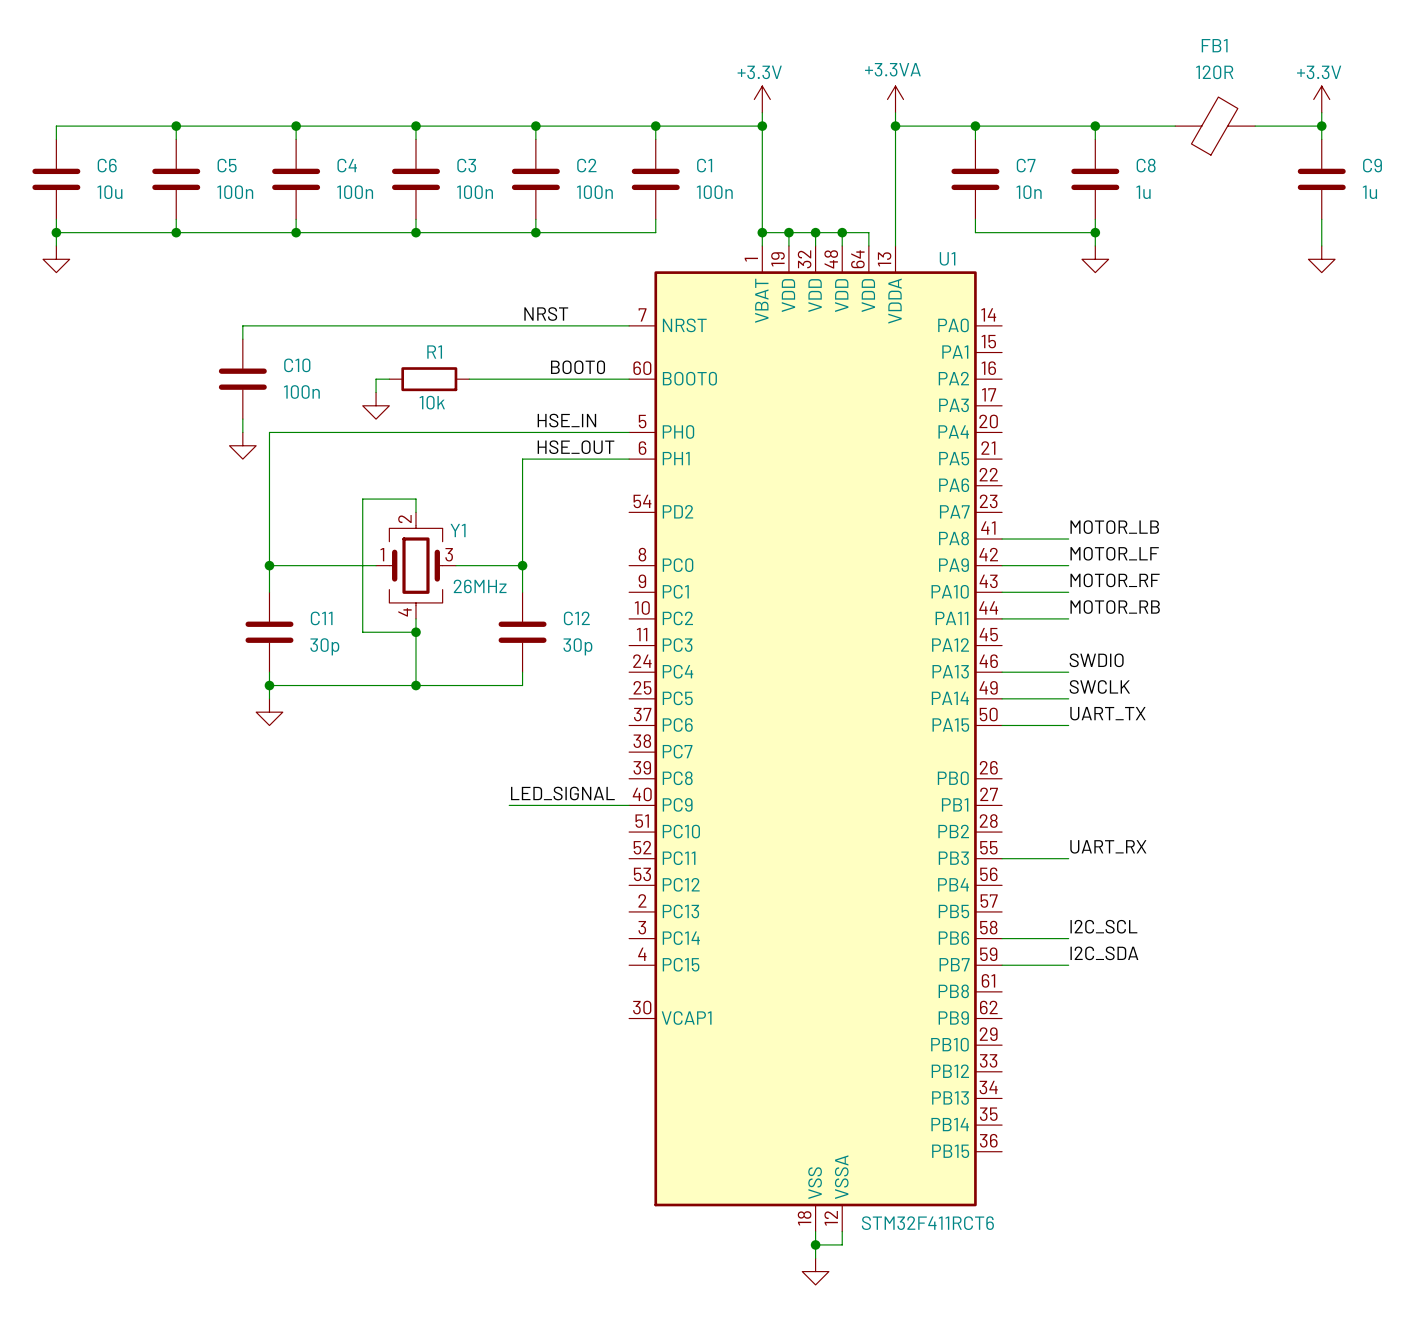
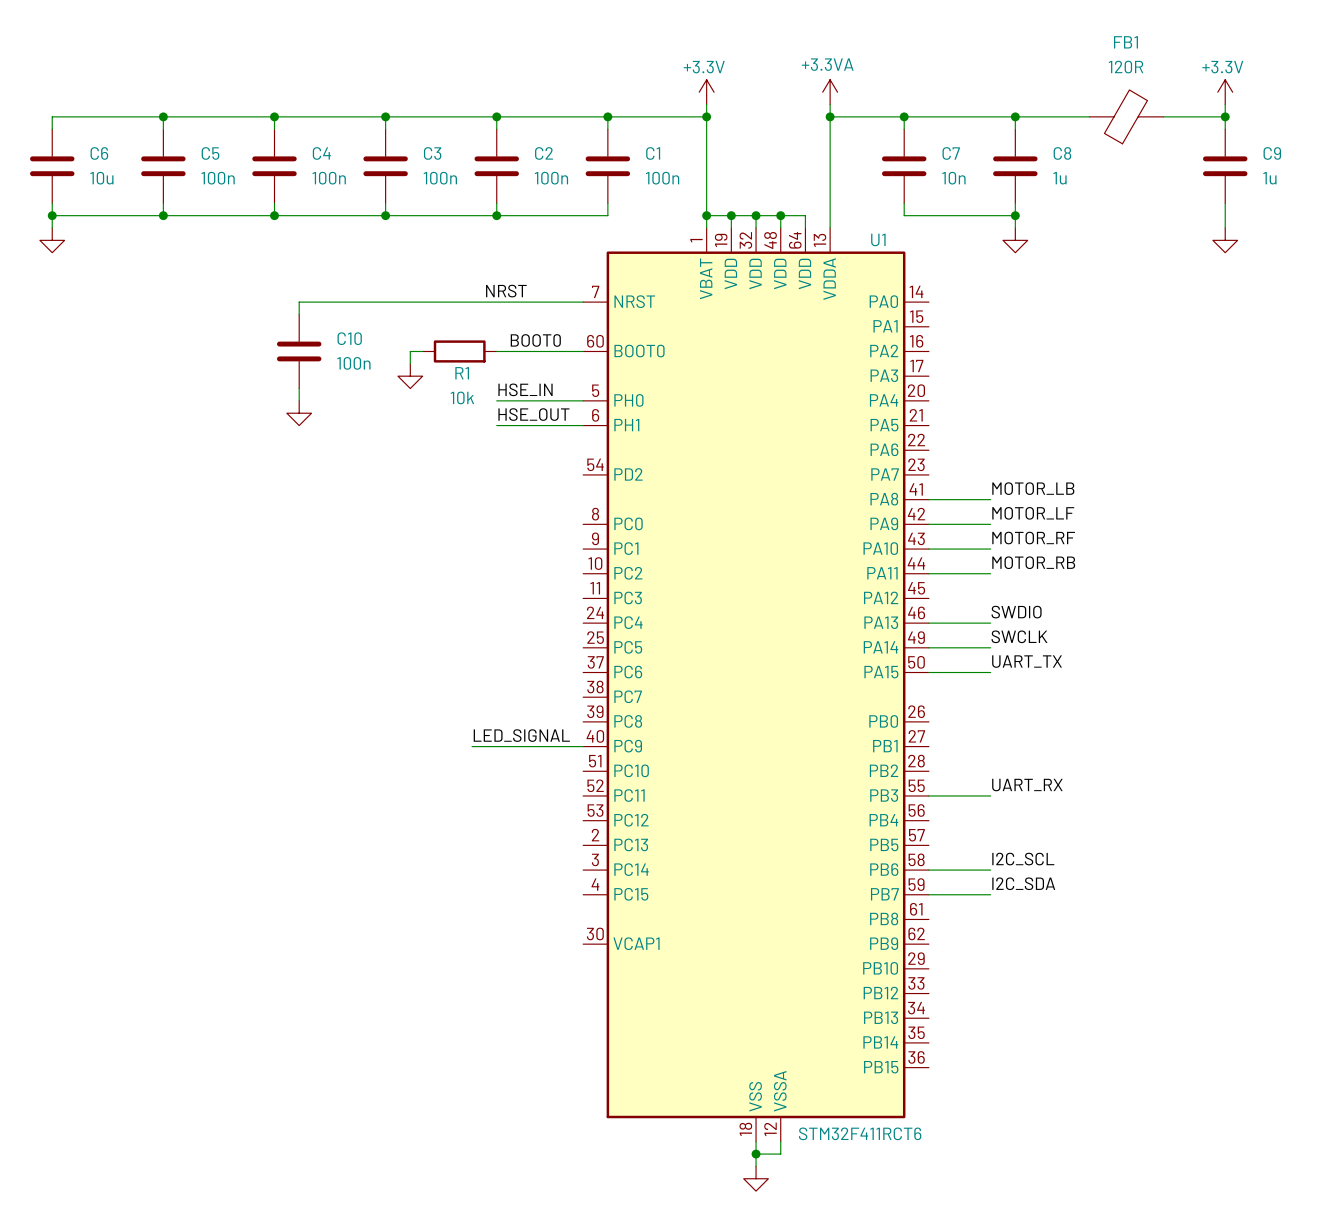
wire: (322, 325) (242, 325) (242, 339) -> (299, 302) (299, 314)
R1 name position: R1 (434, 352) -> R1 (462, 373)
C10 position: (242, 379) -> (299, 351)
wire: (389, 379) (376, 379) (376, 392) -> (422, 351) (410, 351) (410, 363)
R1 position: (429, 379) -> (459, 351)
wire: (469, 379) (535, 379) -> none
R1 value position: 10k (432, 402) -> 10k (462, 397)
power symbol: (376, 405) -> none
power symbol: none -> (410, 376)
wire: (242, 419) (242, 432) -> (299, 388) (299, 400)
wire: (535, 432) (269, 432) (269, 592) -> none
power symbol: (242, 445) -> none
power symbol: none -> (299, 413)
wire: (535, 459) (522, 459) (522, 592) -> none
wire: (415, 512) (415, 499) (362, 499) (362, 632) (415, 632) -> none
wire: (269, 565) (376, 565) -> none
junction: (269, 565) -> none
Y1: 26MHz (415, 565) -> none
wire: (455, 565) (522, 565) -> none
junction: (522, 565) -> none
wire: (415, 618) (415, 685) -> none
C11: 30p (269, 632) -> none
junction: (415, 632) -> none
C12: 30p (522, 632) -> none
wire: (269, 672) (269, 698) -> none
wire: (522, 672) (522, 685) (269, 685) -> none
junction: (269, 685) -> none
junction: (415, 685) -> none
power symbol: (269, 712) -> none

